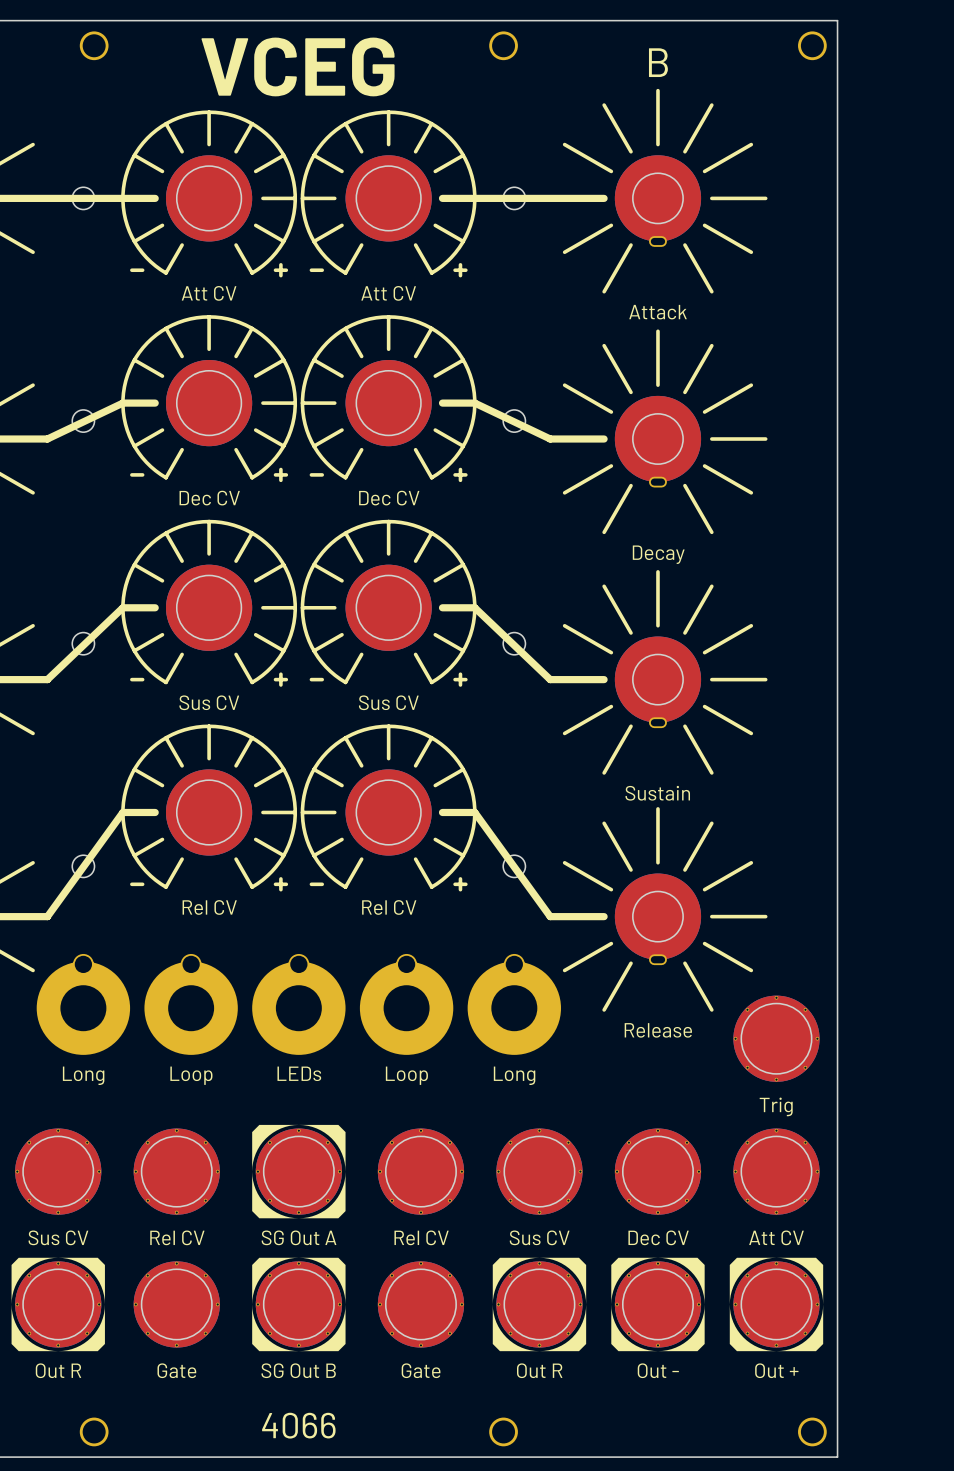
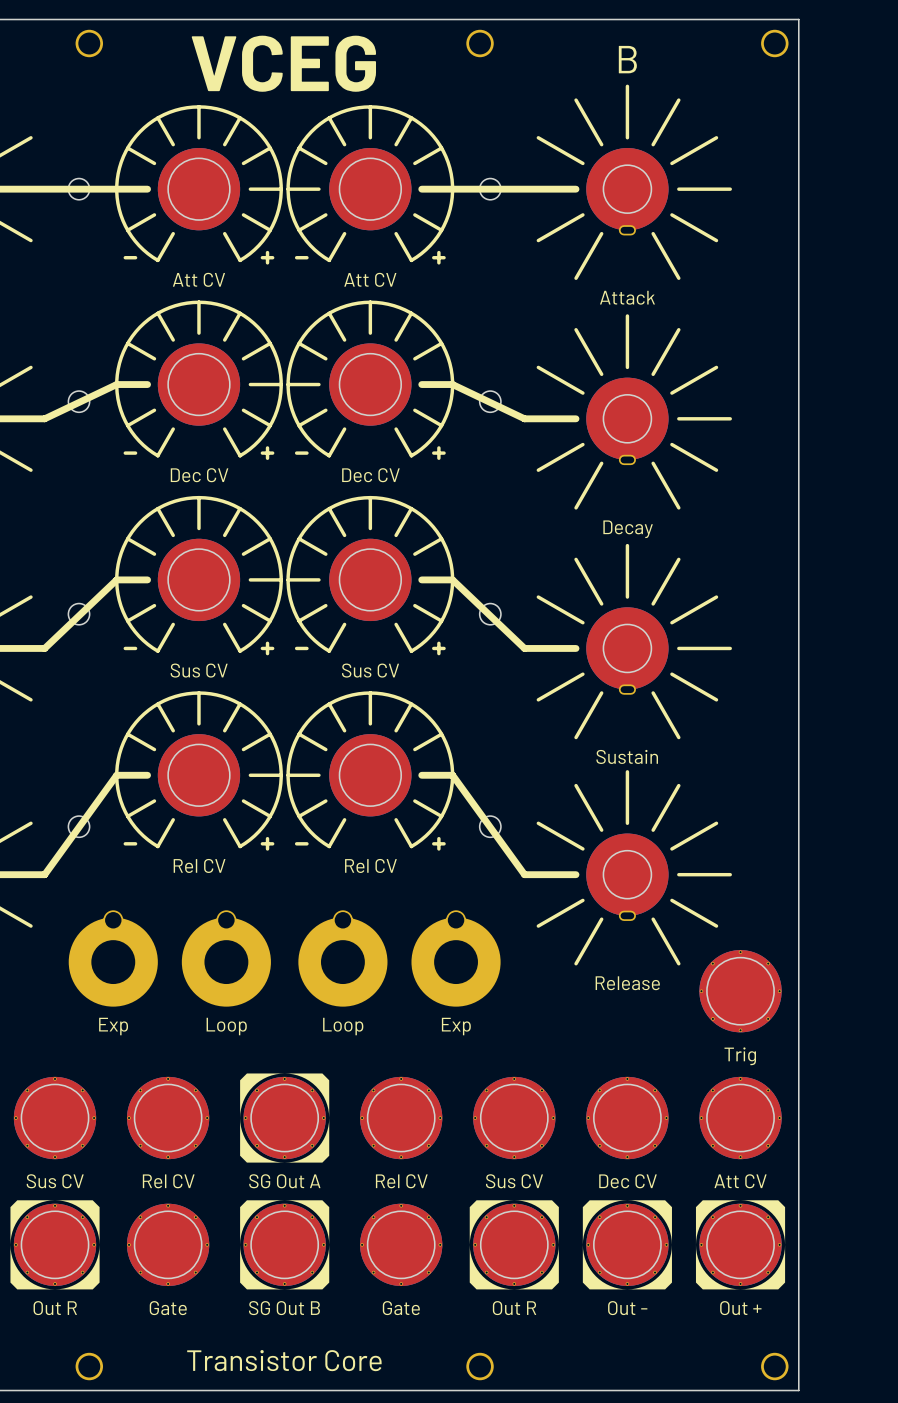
part: Long (83, 1004) -> none
part: none -> Exp (113, 958)
part position: (191, 1004) -> (226, 958)
part: LEDs (298, 1004) -> none
part position: (406, 1004) -> (342, 958)
part: none -> Exp (456, 958)
part: Long (514, 1004) -> none
text: 4066 (298, 1425) -> Transistor Core (284, 1360)

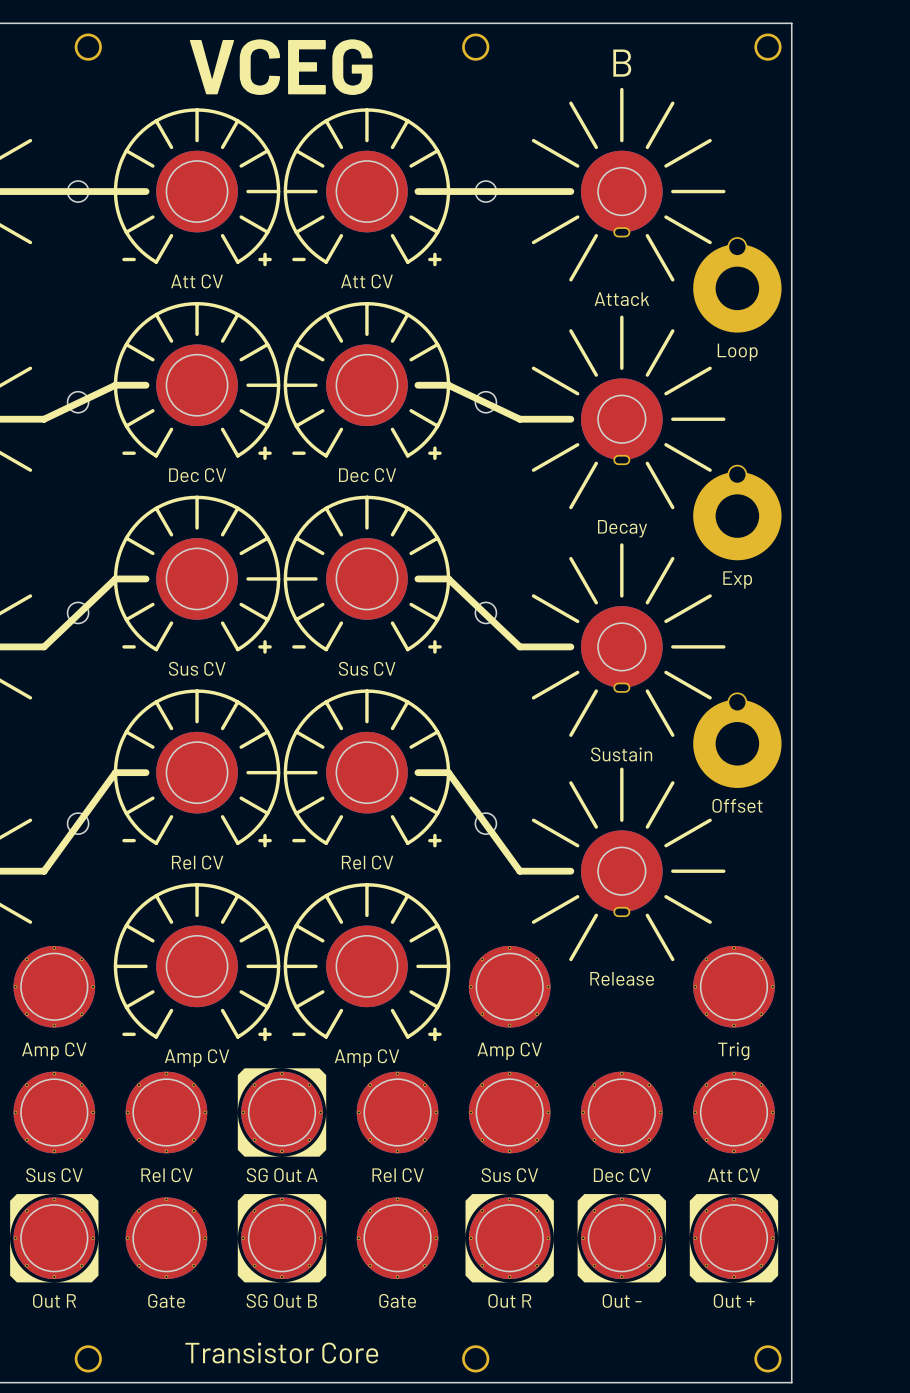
part: none -> Loop (737, 284)
part: none -> Exp (737, 512)
part: none -> Offset (737, 740)
part: Exp (113, 958) -> none
part: Loop (226, 958) -> none
part: Loop (342, 958) -> none
part: Exp (456, 958) -> none
part: none -> Amp CV (197, 962)
part: none -> Amp CV (366, 962)
part: none -> Amp CV (54, 986)
part: none -> Amp CV (509, 986)

